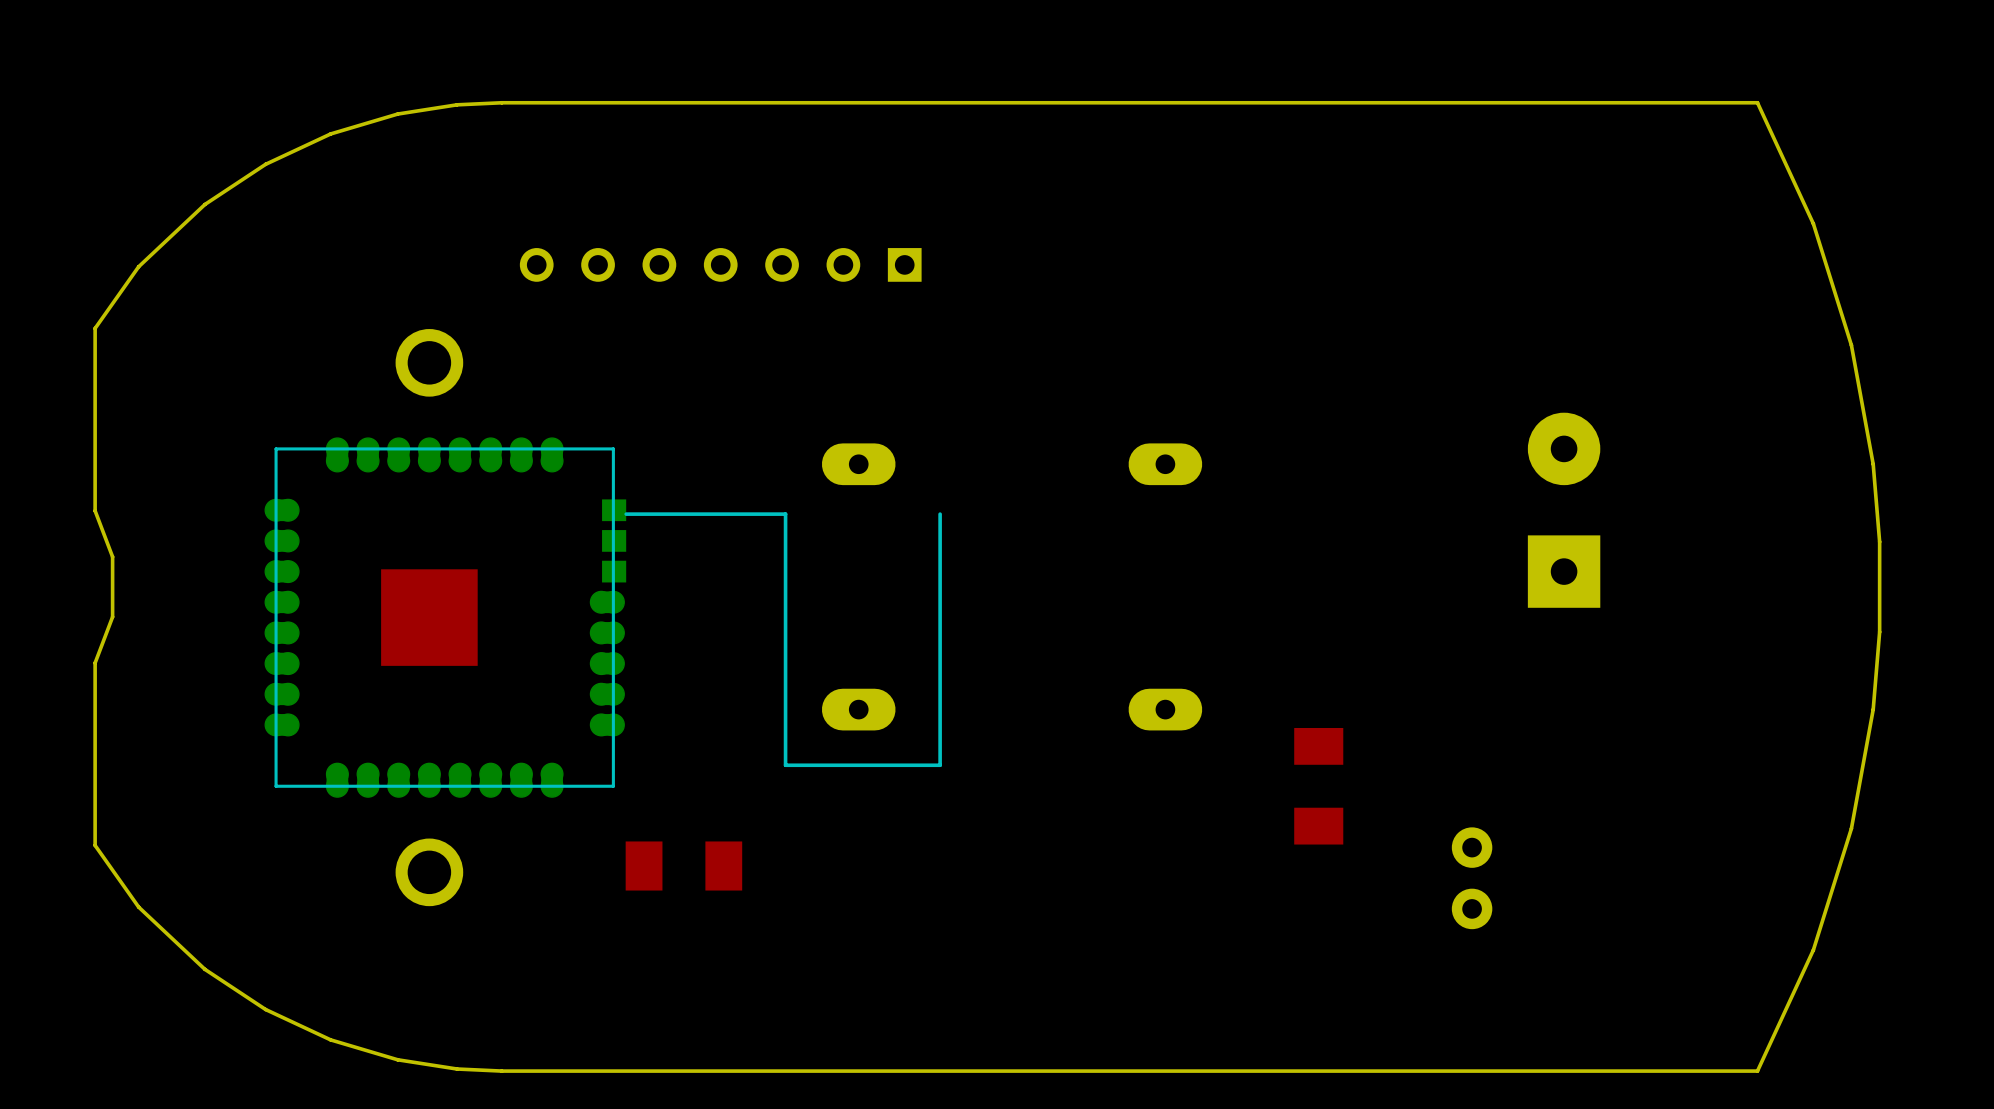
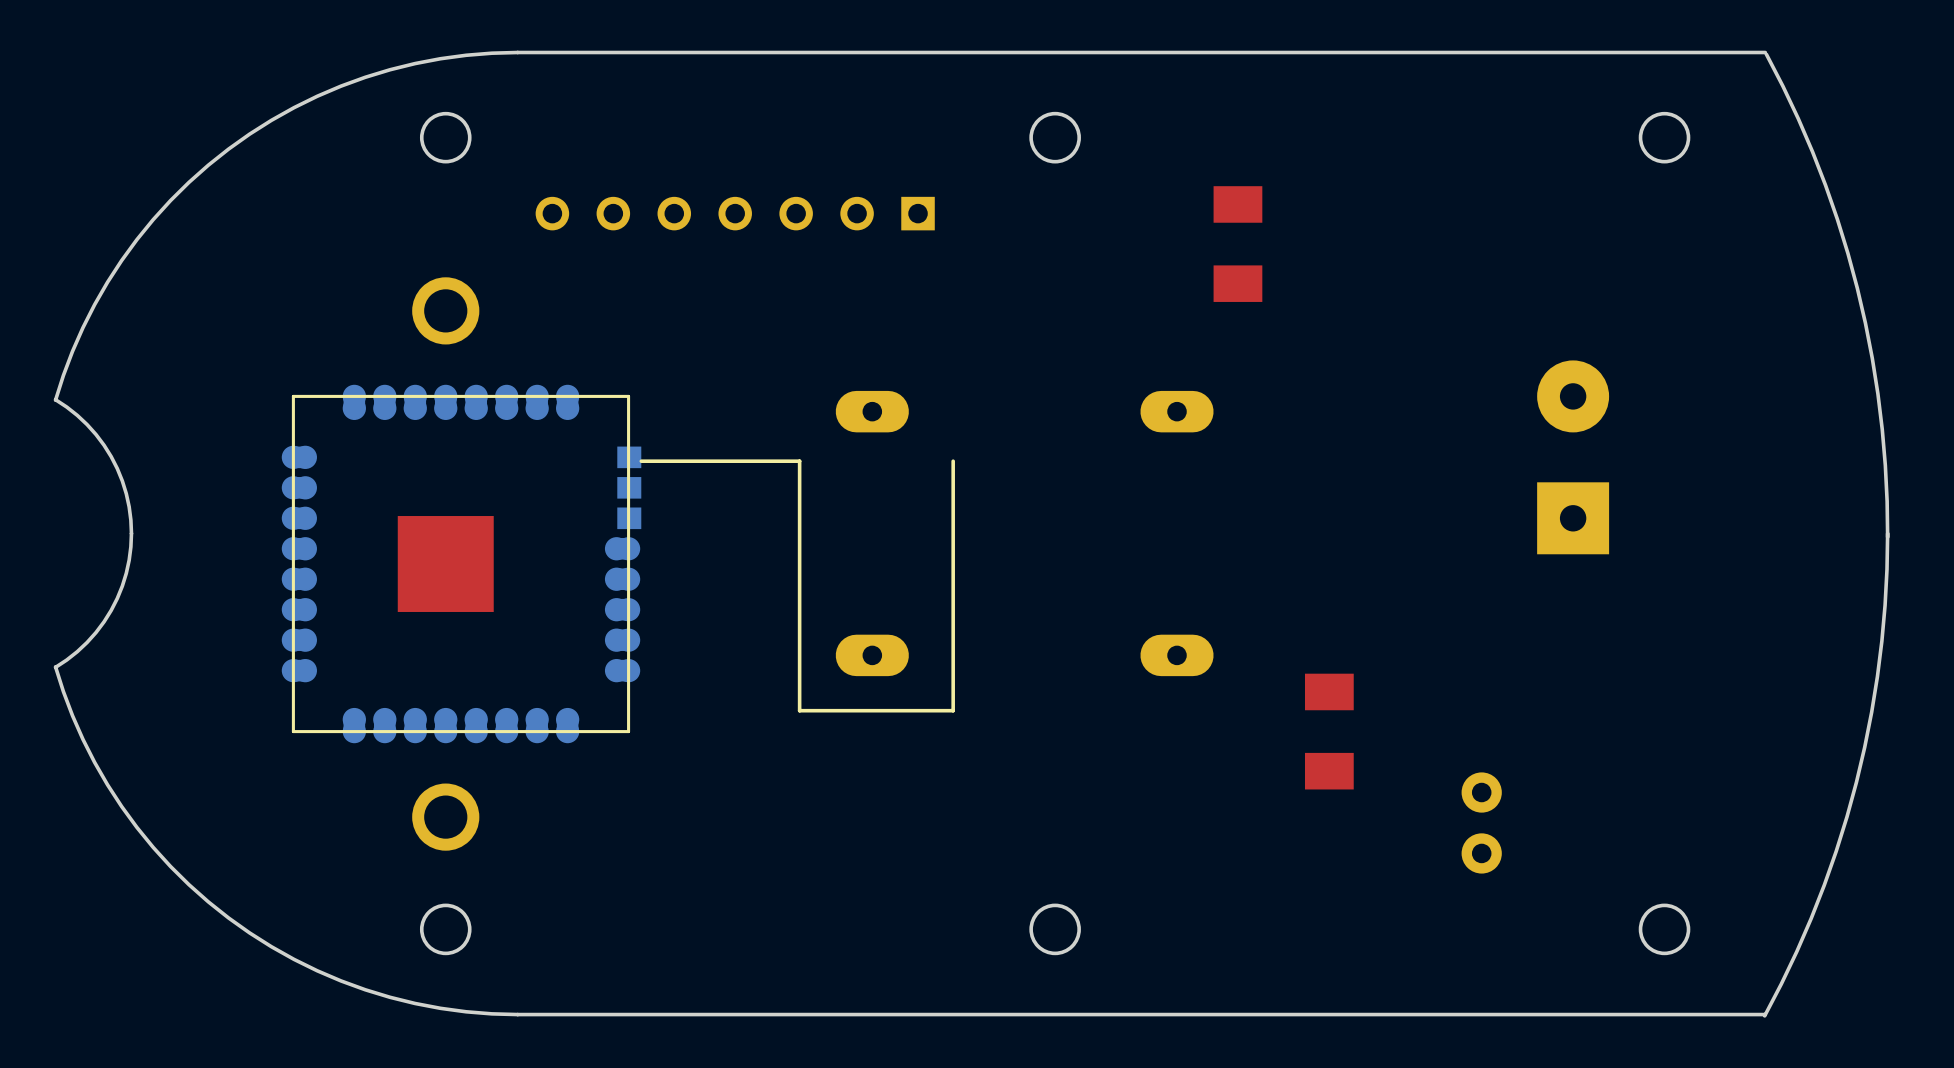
drawing: none -> [53, 50, 1890, 1018]
drawing: [93, 100, 1882, 1073] -> none
part: none -> (1237, 244)
part: (683, 865) -> none

